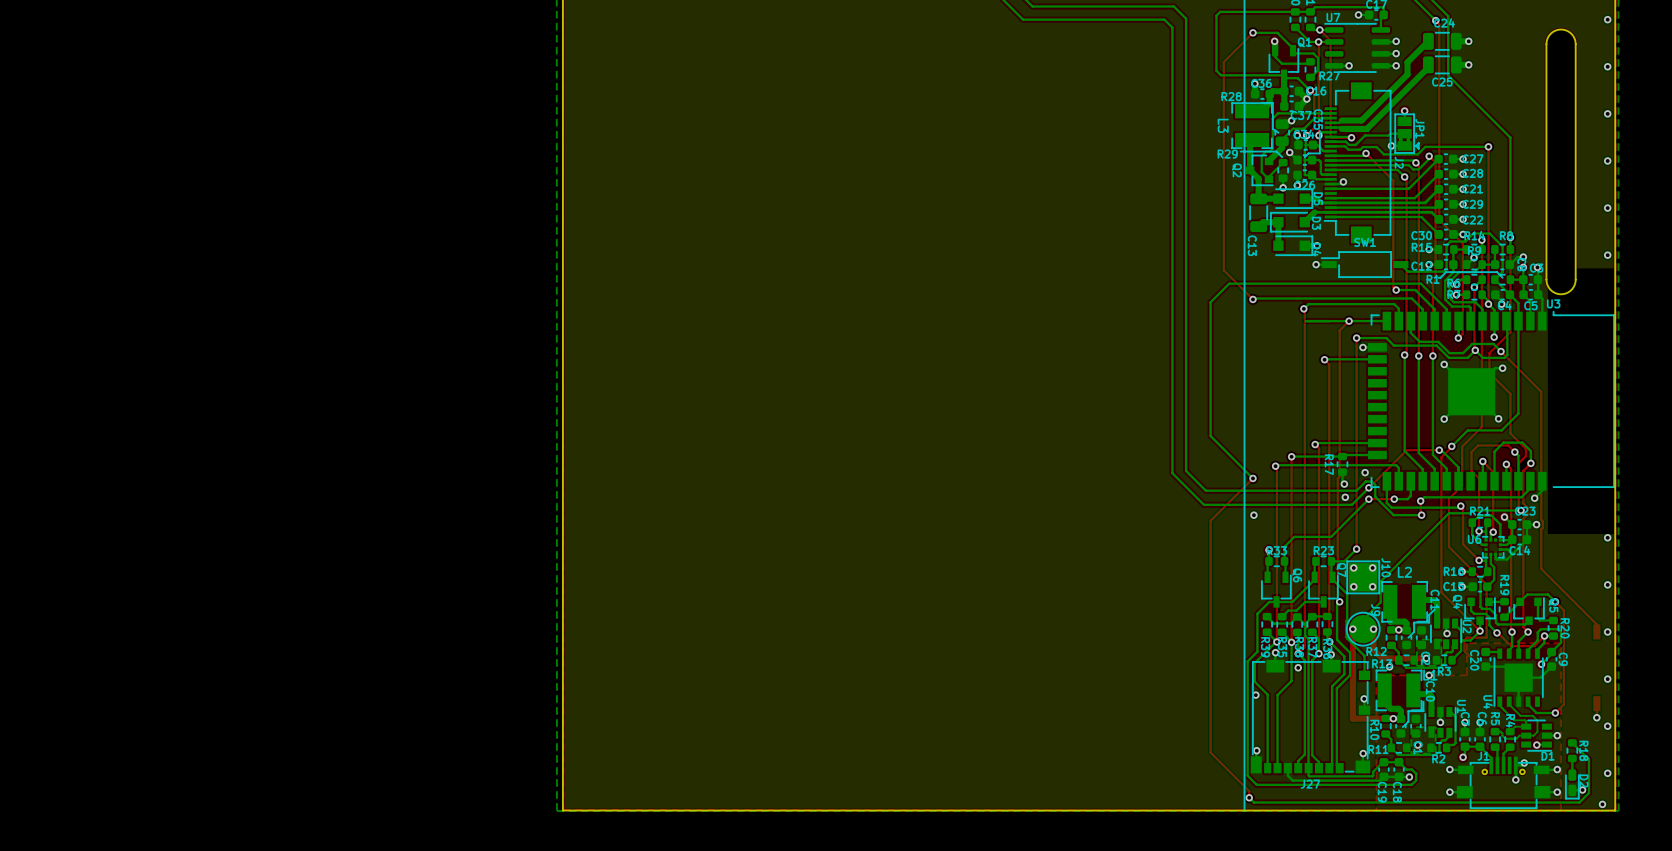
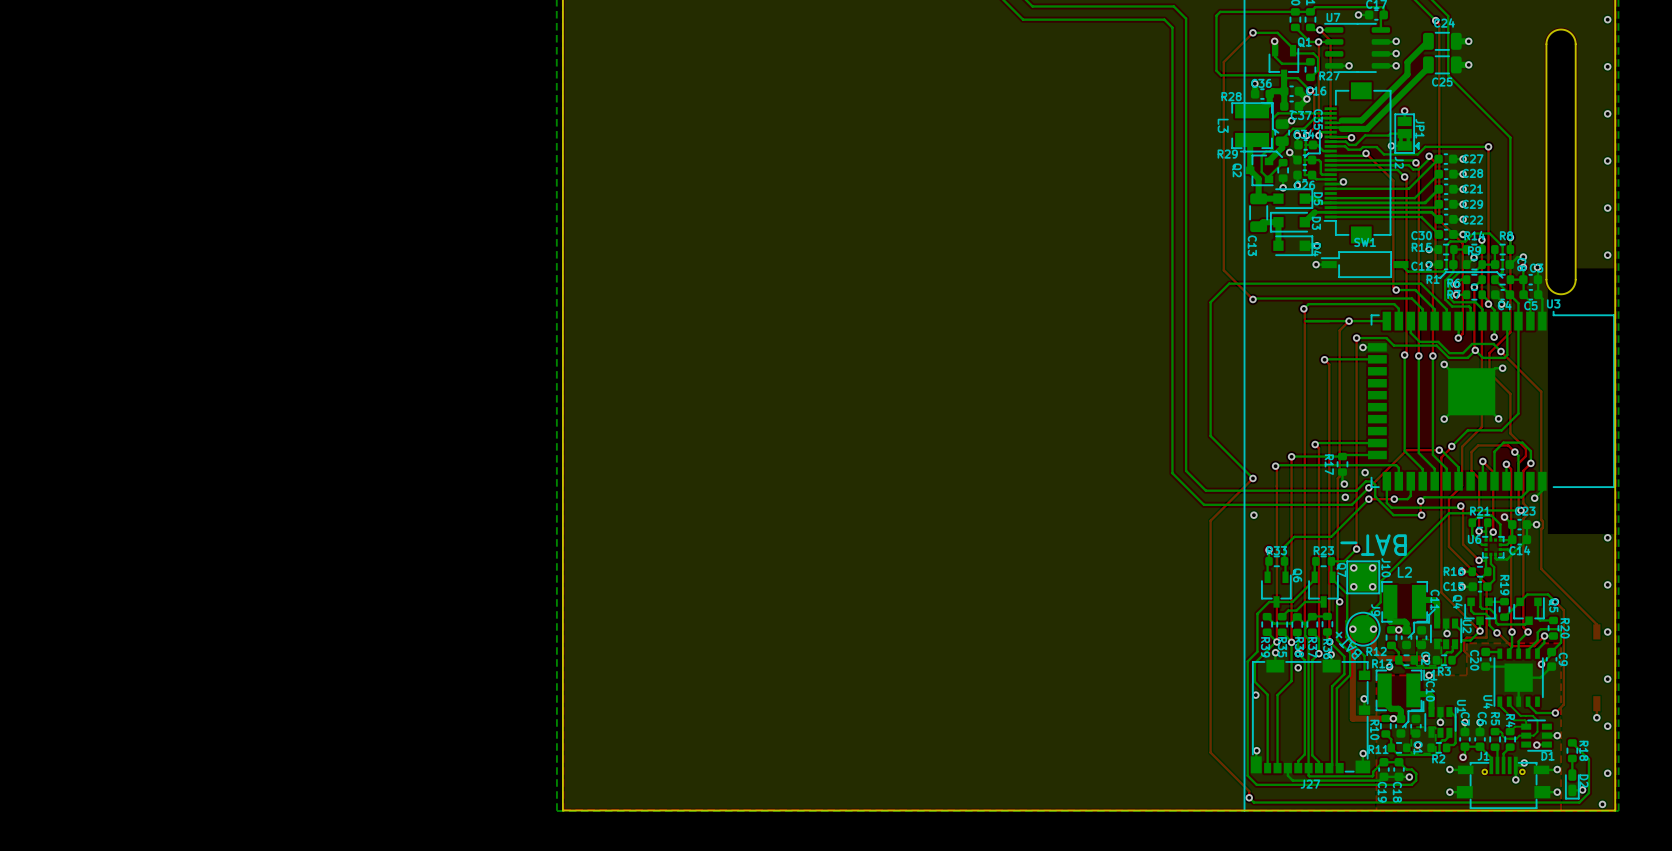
text: none -> BAT- (1373, 545)
text: none -> BAT+ (1349, 645)

